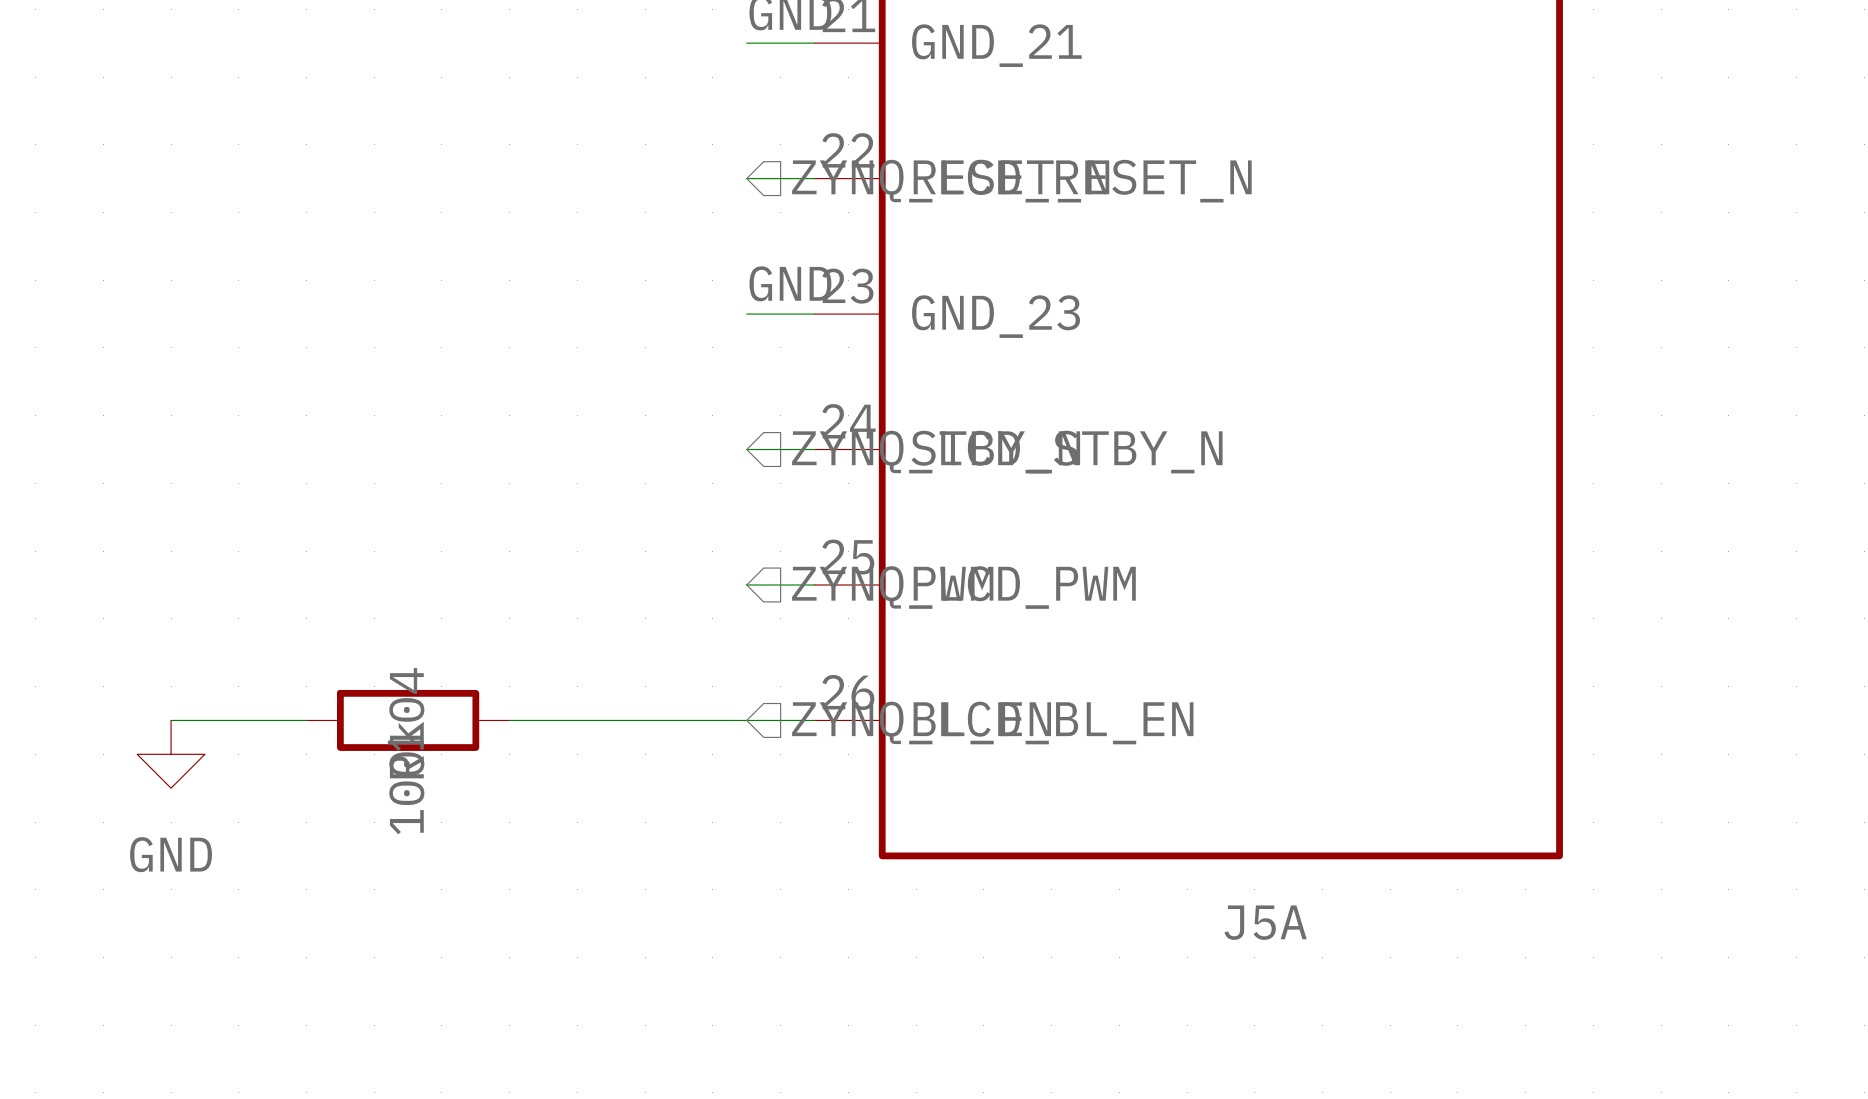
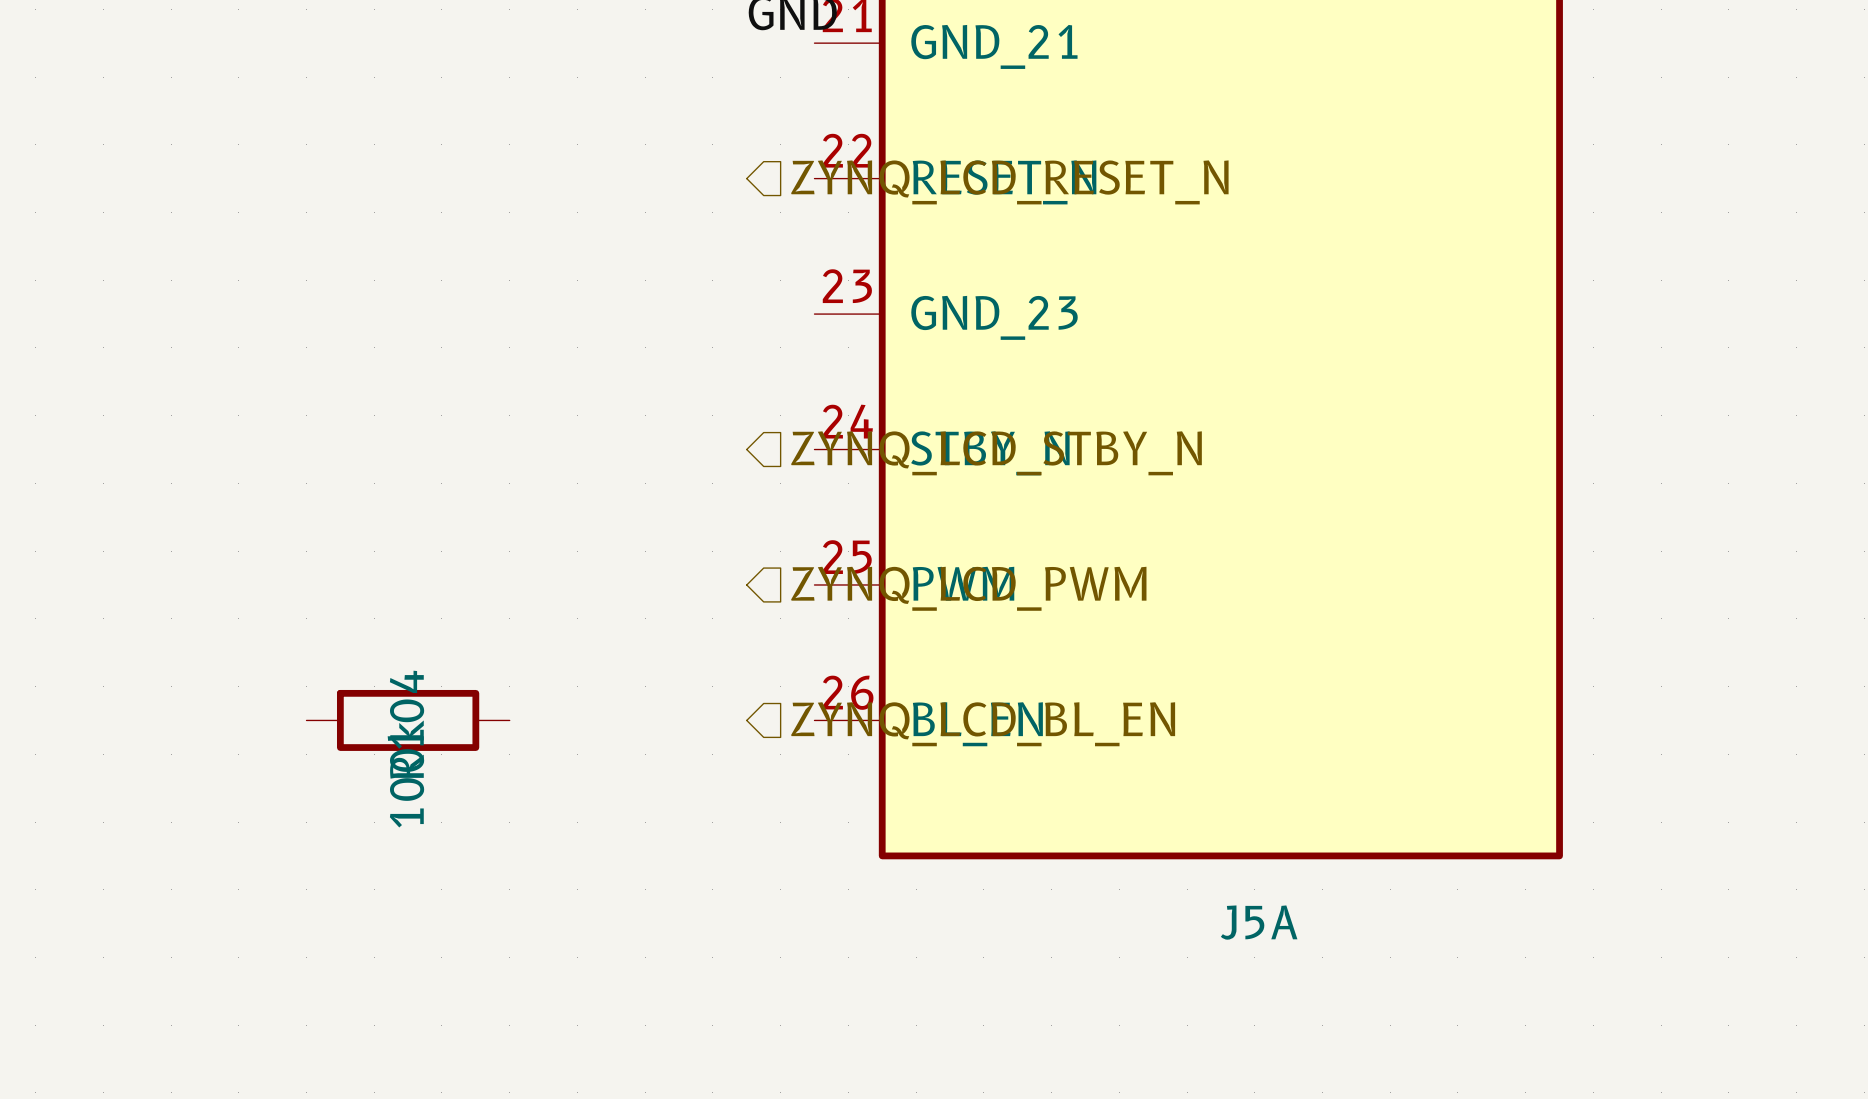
wire: (746, 43) (814, 43) -> none
wire: (746, 178) (814, 178) -> none
label: GND (790, 283) -> none
wire: (746, 314) (814, 314) -> none
wire: (746, 449) (814, 449) -> none
wire: (746, 584) (814, 584) -> none
wire: (171, 720) (306, 720) -> none
wire: (509, 720) (814, 720) -> none
power symbol: GND (171, 754) -> none

